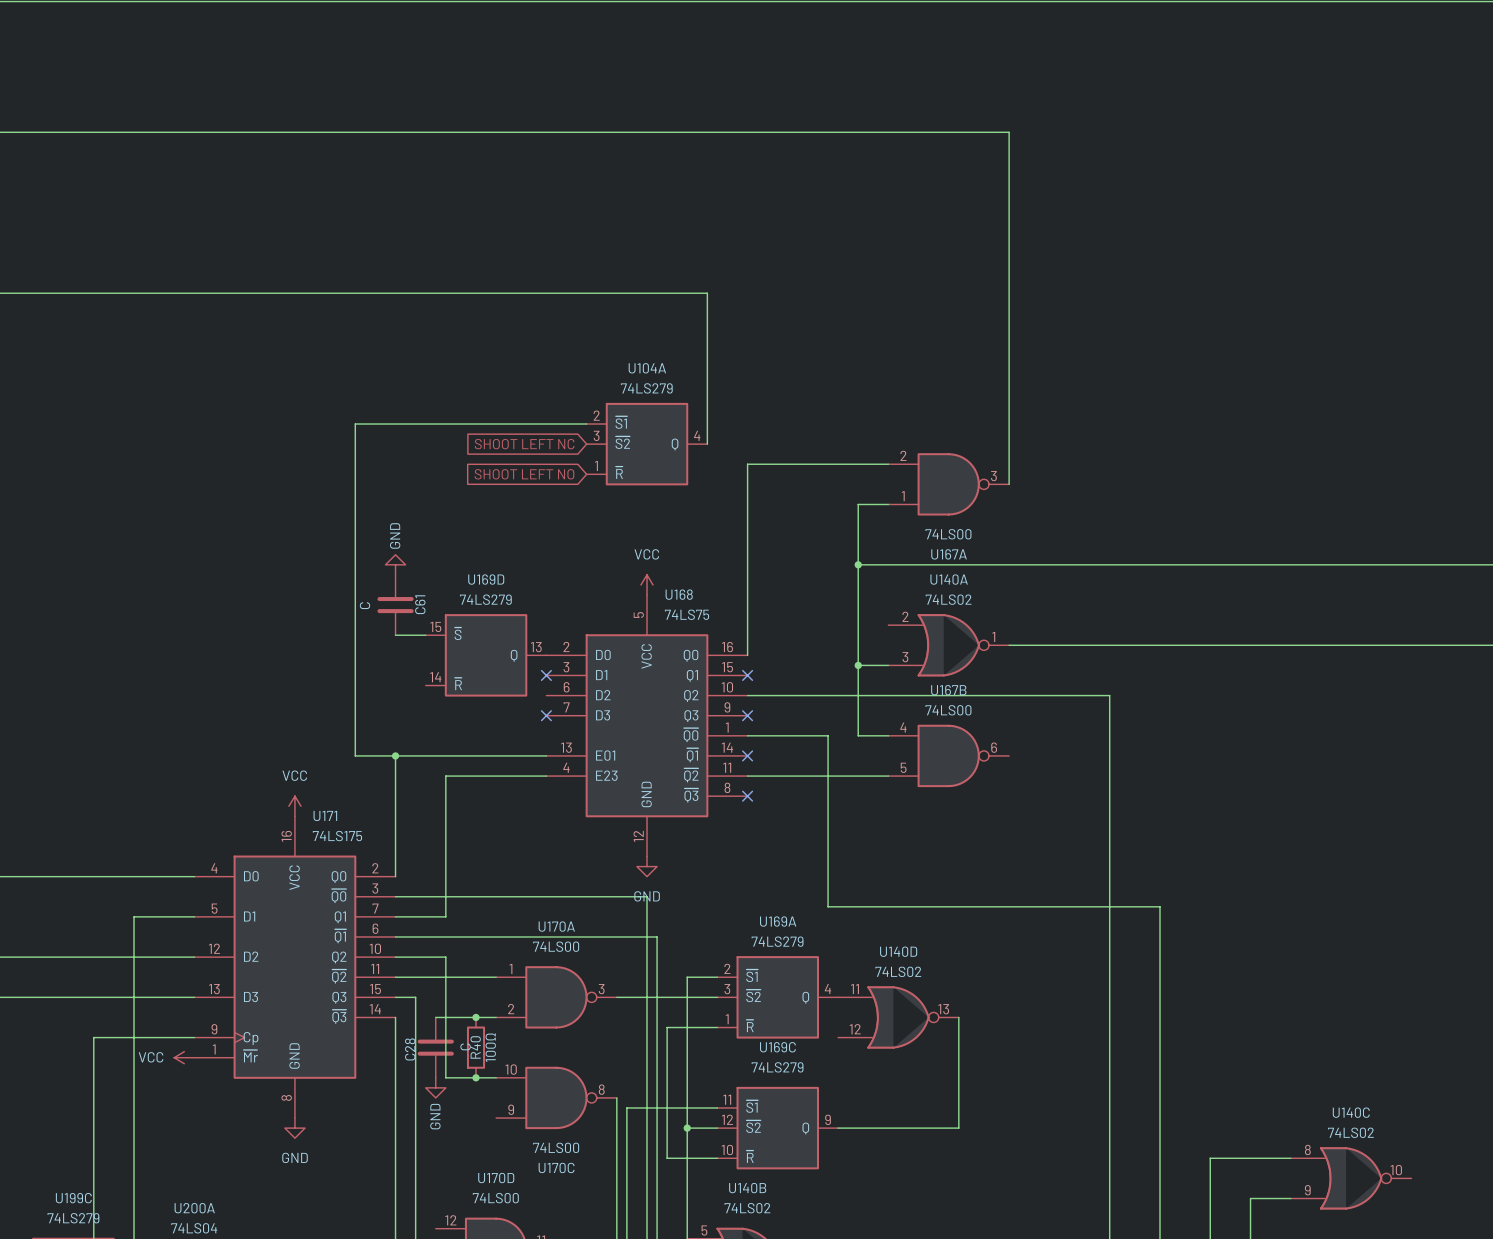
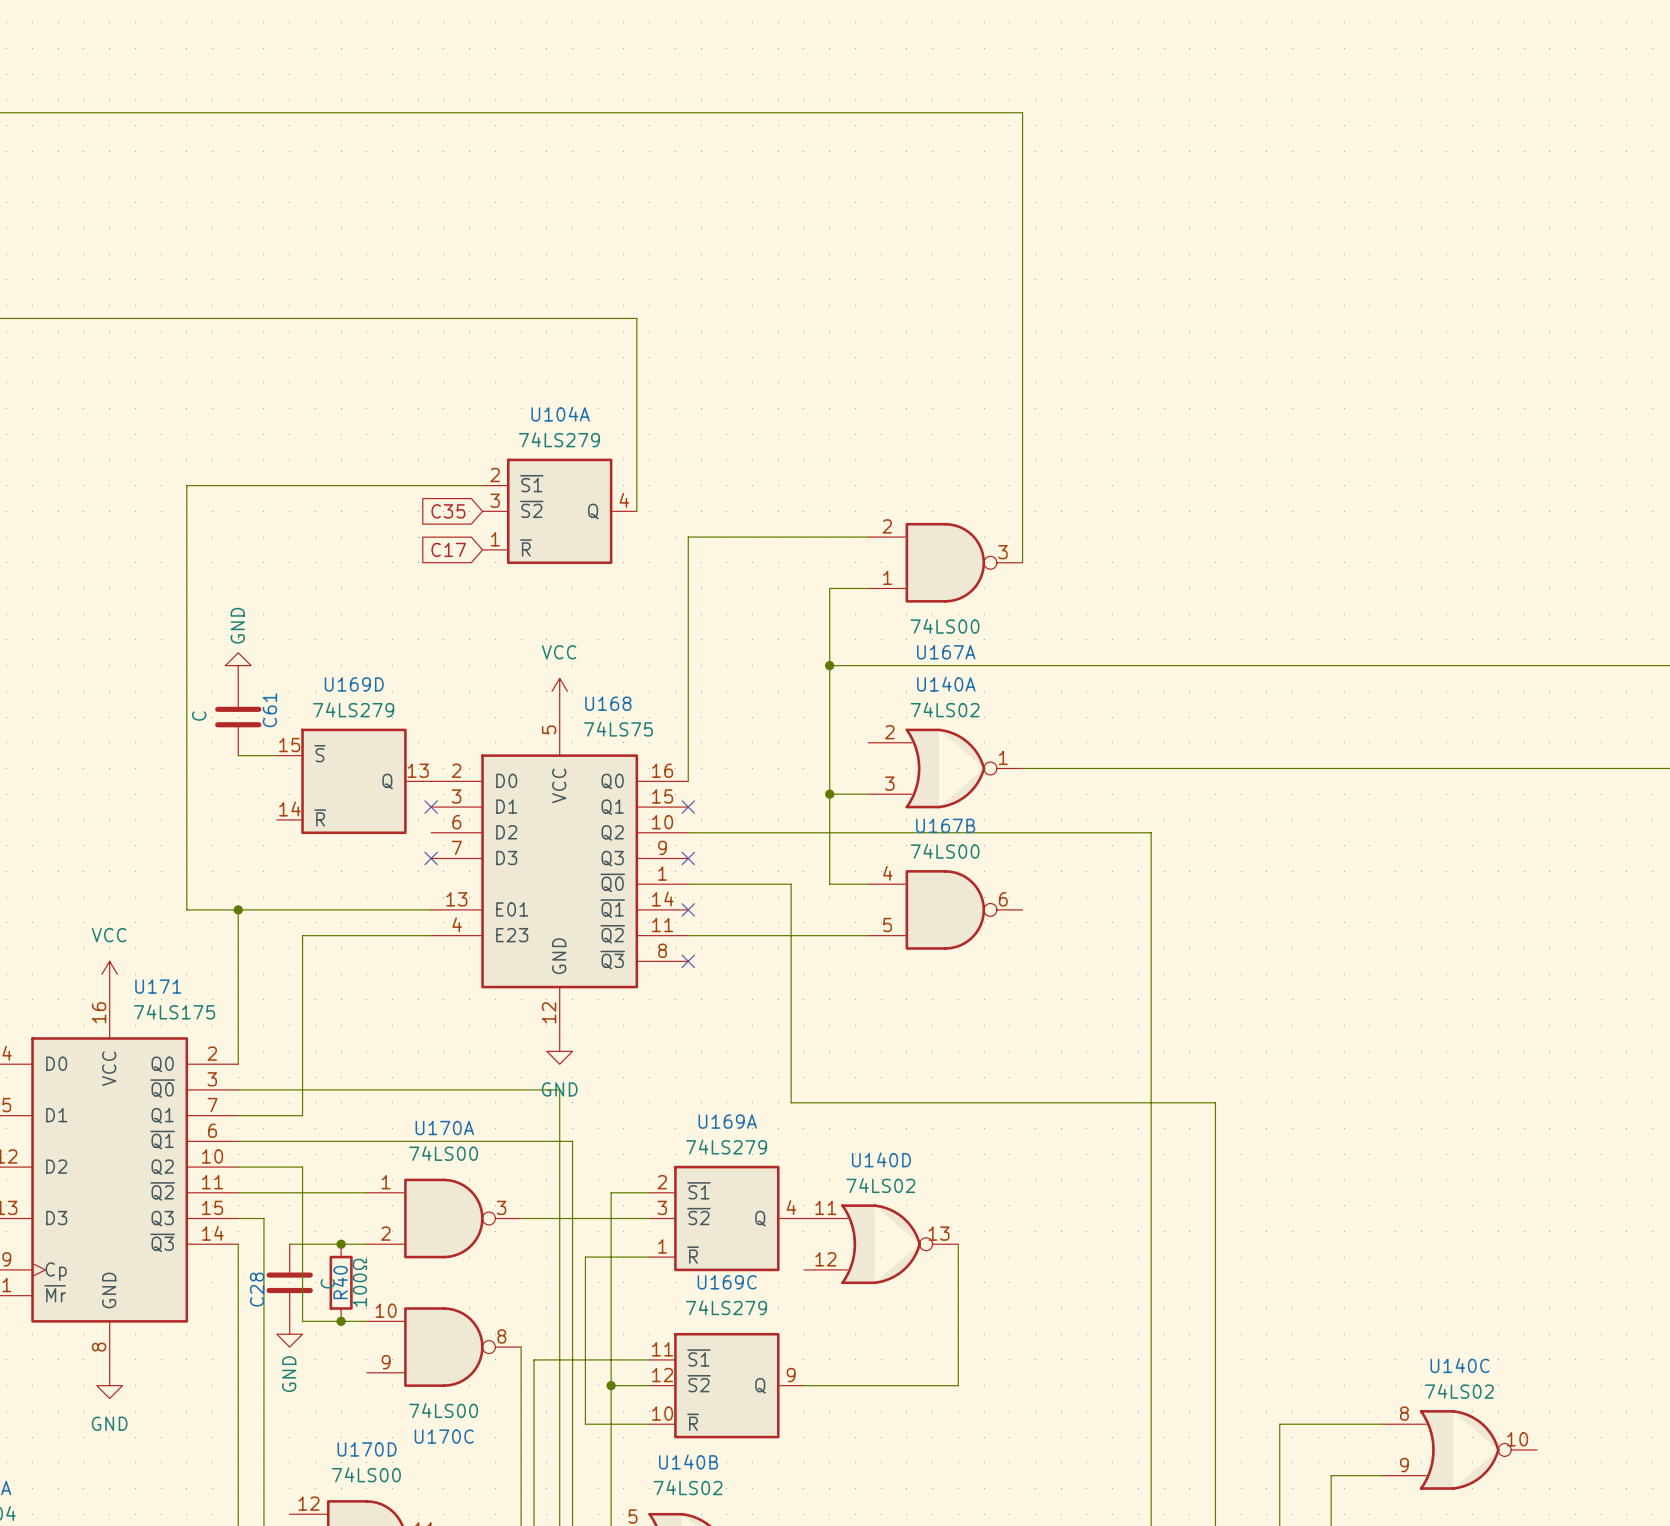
global label: SHOOT LEFT NC (524, 444) -> C35 (448, 511)
global label: SHOOT LEFT NO (524, 474) -> C17 (448, 549)

